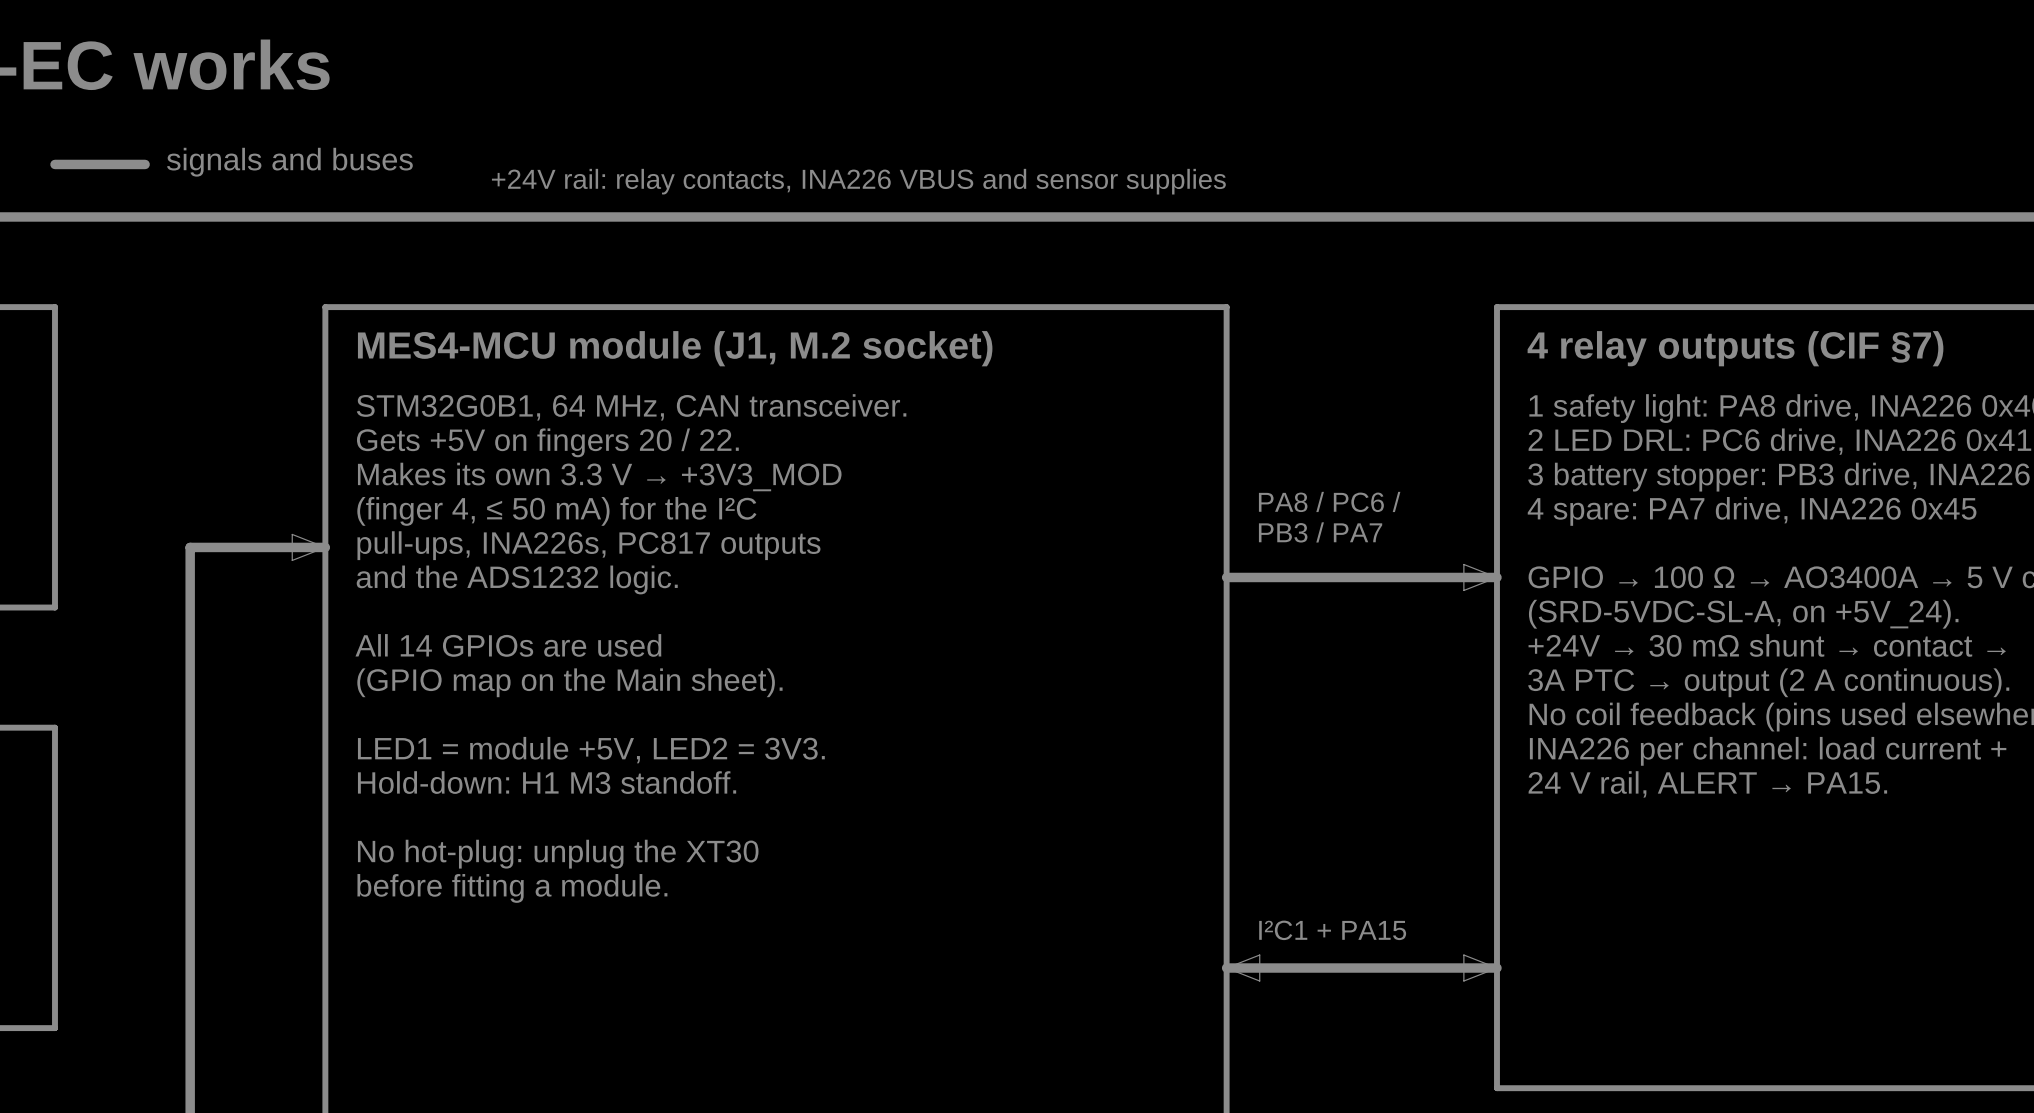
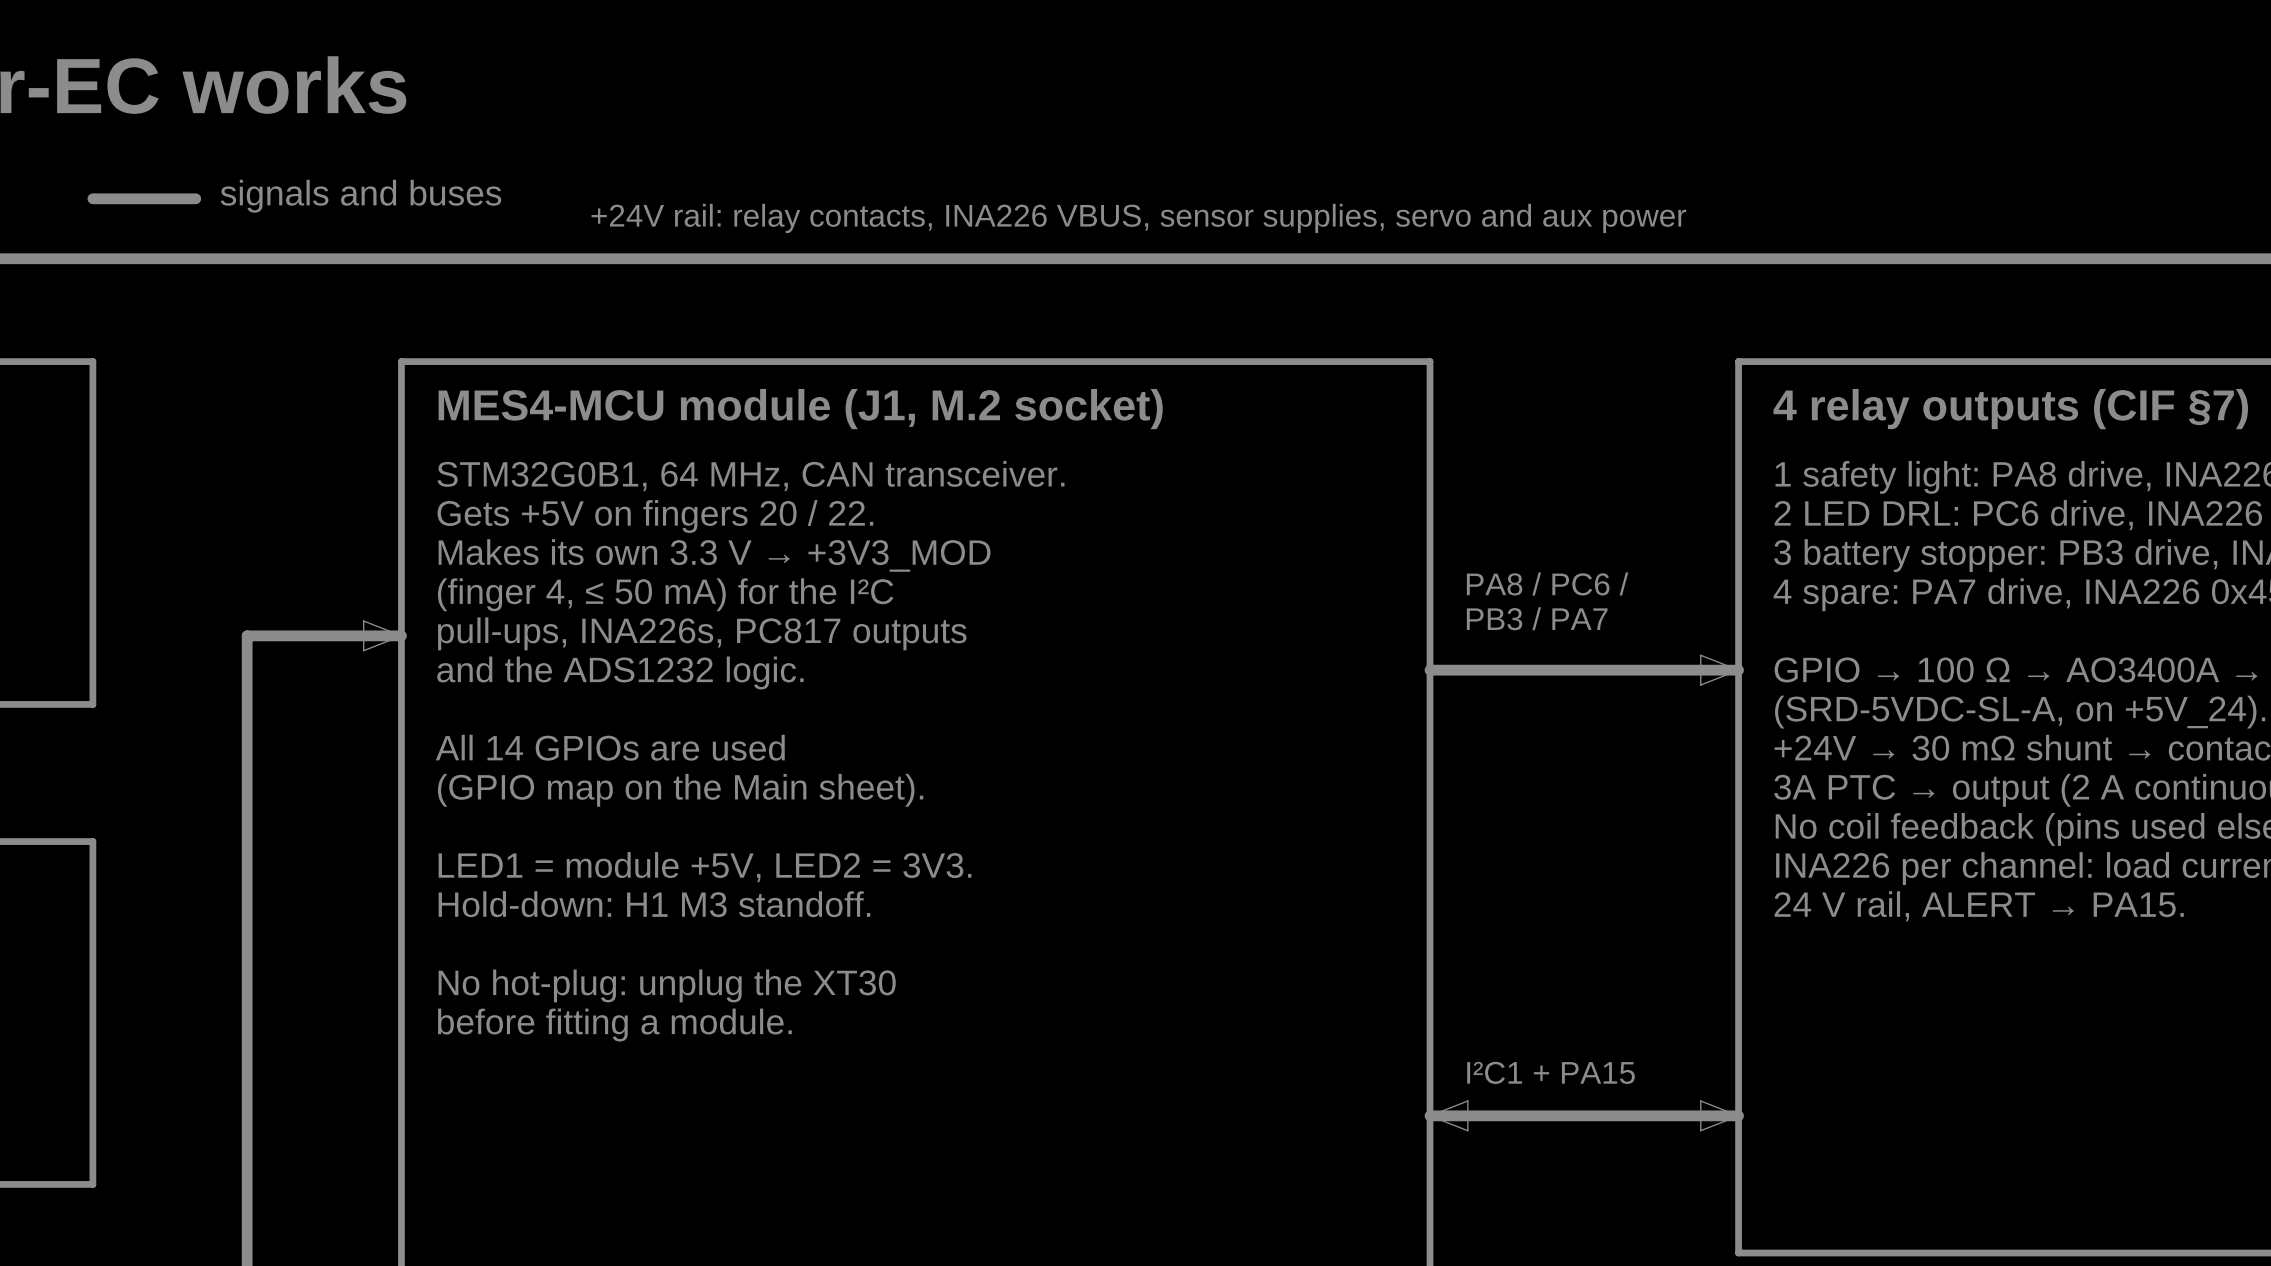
text: +24V rail: relay contacts, INA226 VBUS and sensor supplies (858, 181) -> +24V rail: relay contacts, INA226 VBUS, sensor supplies, servo and aux power (1138, 218)

